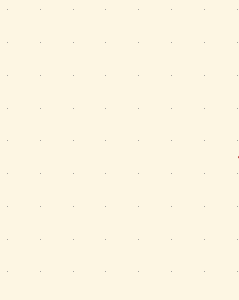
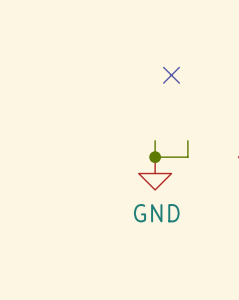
no-connect mark: none -> (171, 75)
wire: none -> (155, 140) (155, 157) (187, 157) (187, 140)
junction: none -> (155, 157)
power symbol: none -> GND (155, 173)

